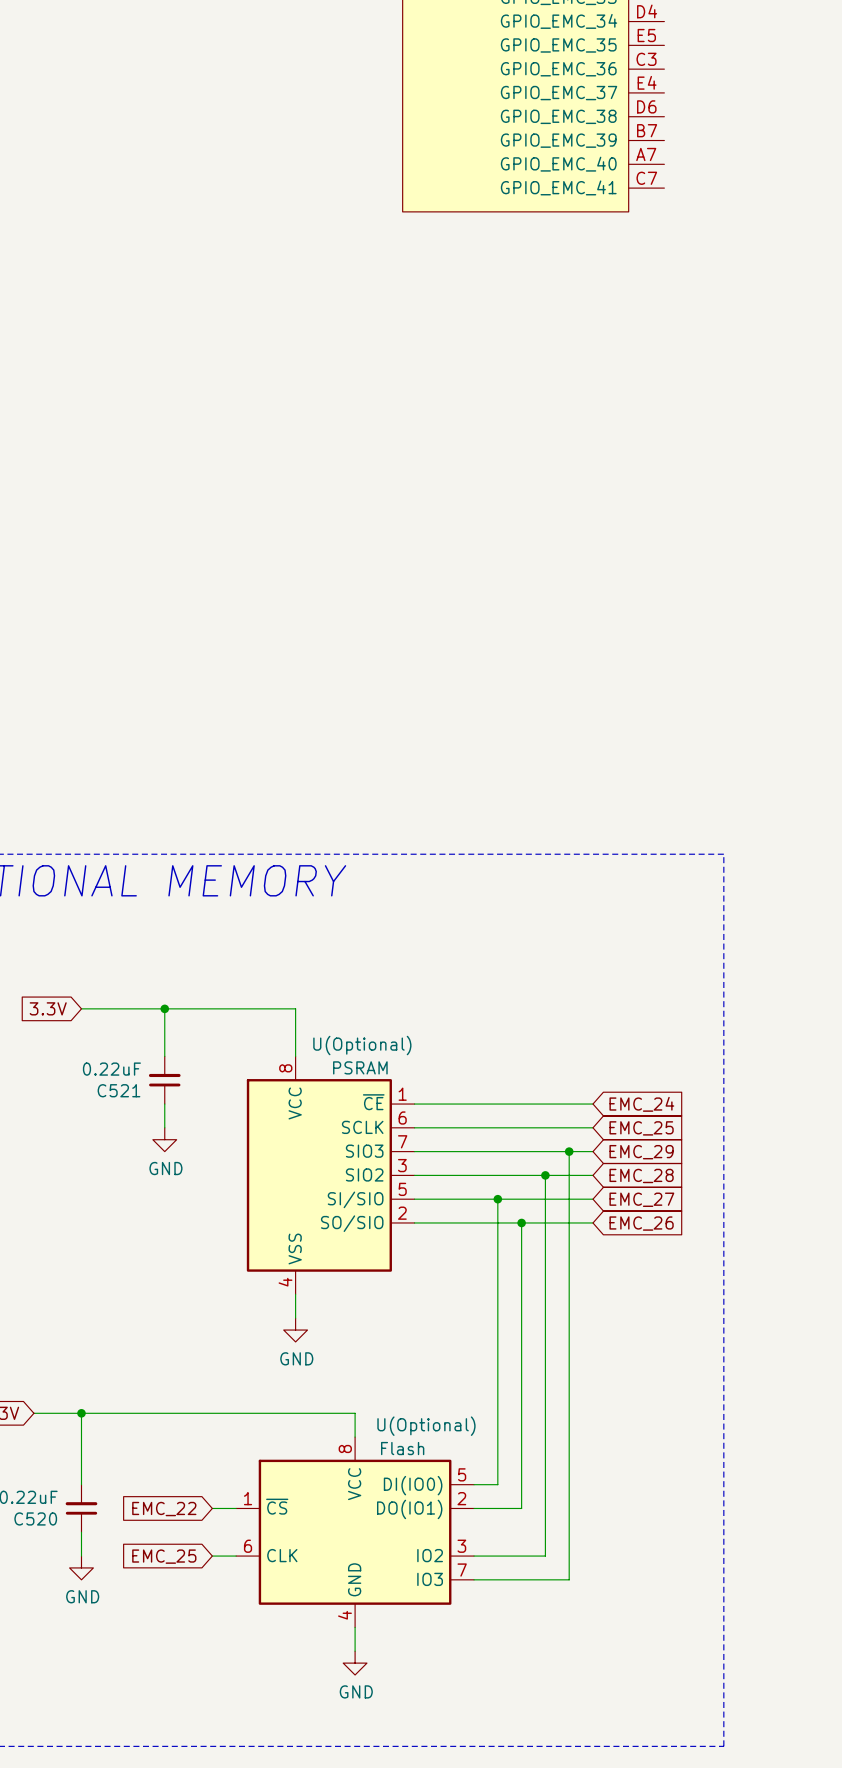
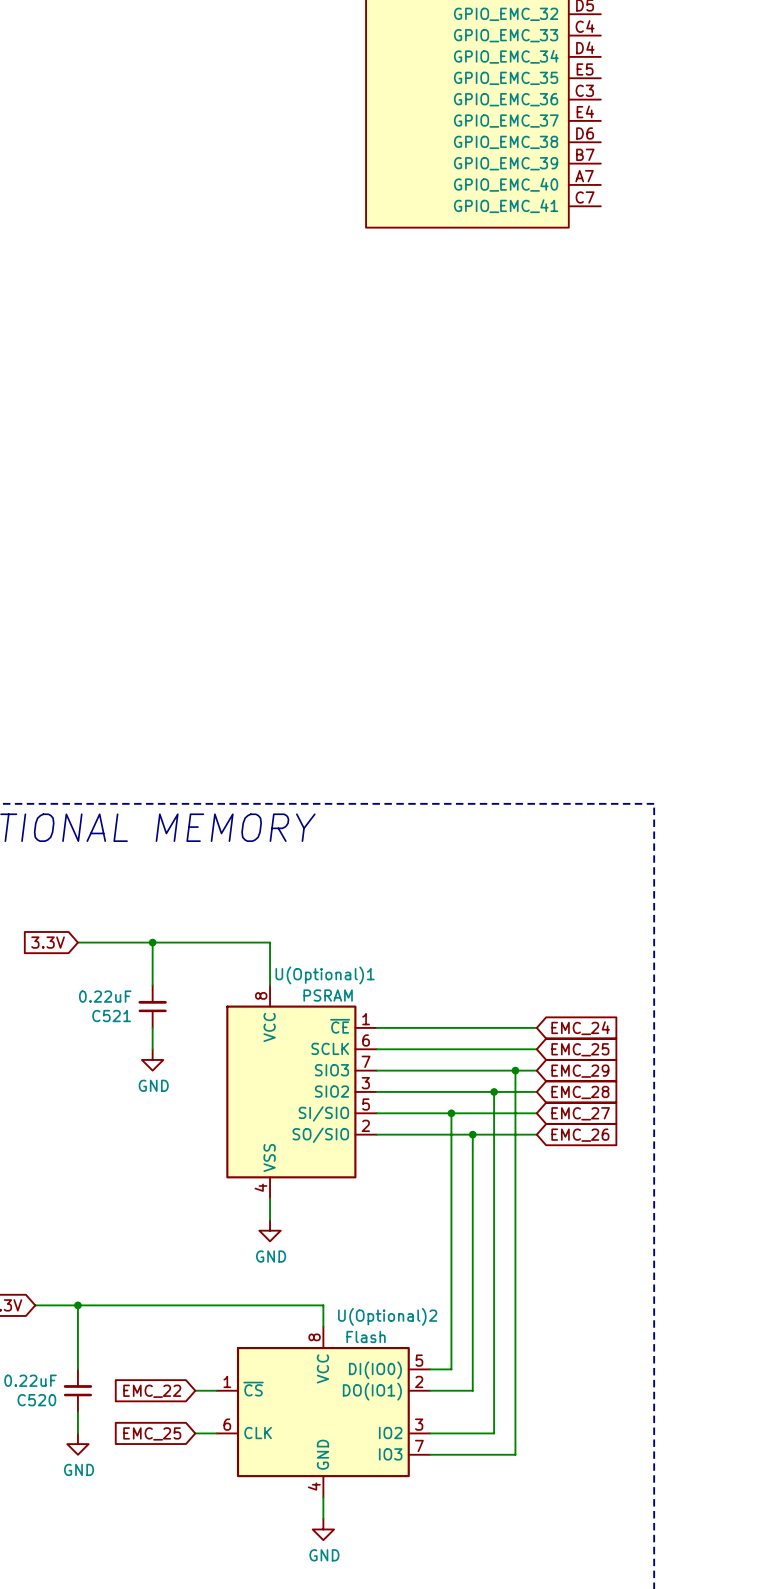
U(Optional) name: U(Optional) (362, 1045) -> U(Optional)1 (325, 975)
U(Optional) name: U(Optional) (426, 1426) -> U(Optional)2 (387, 1316)

